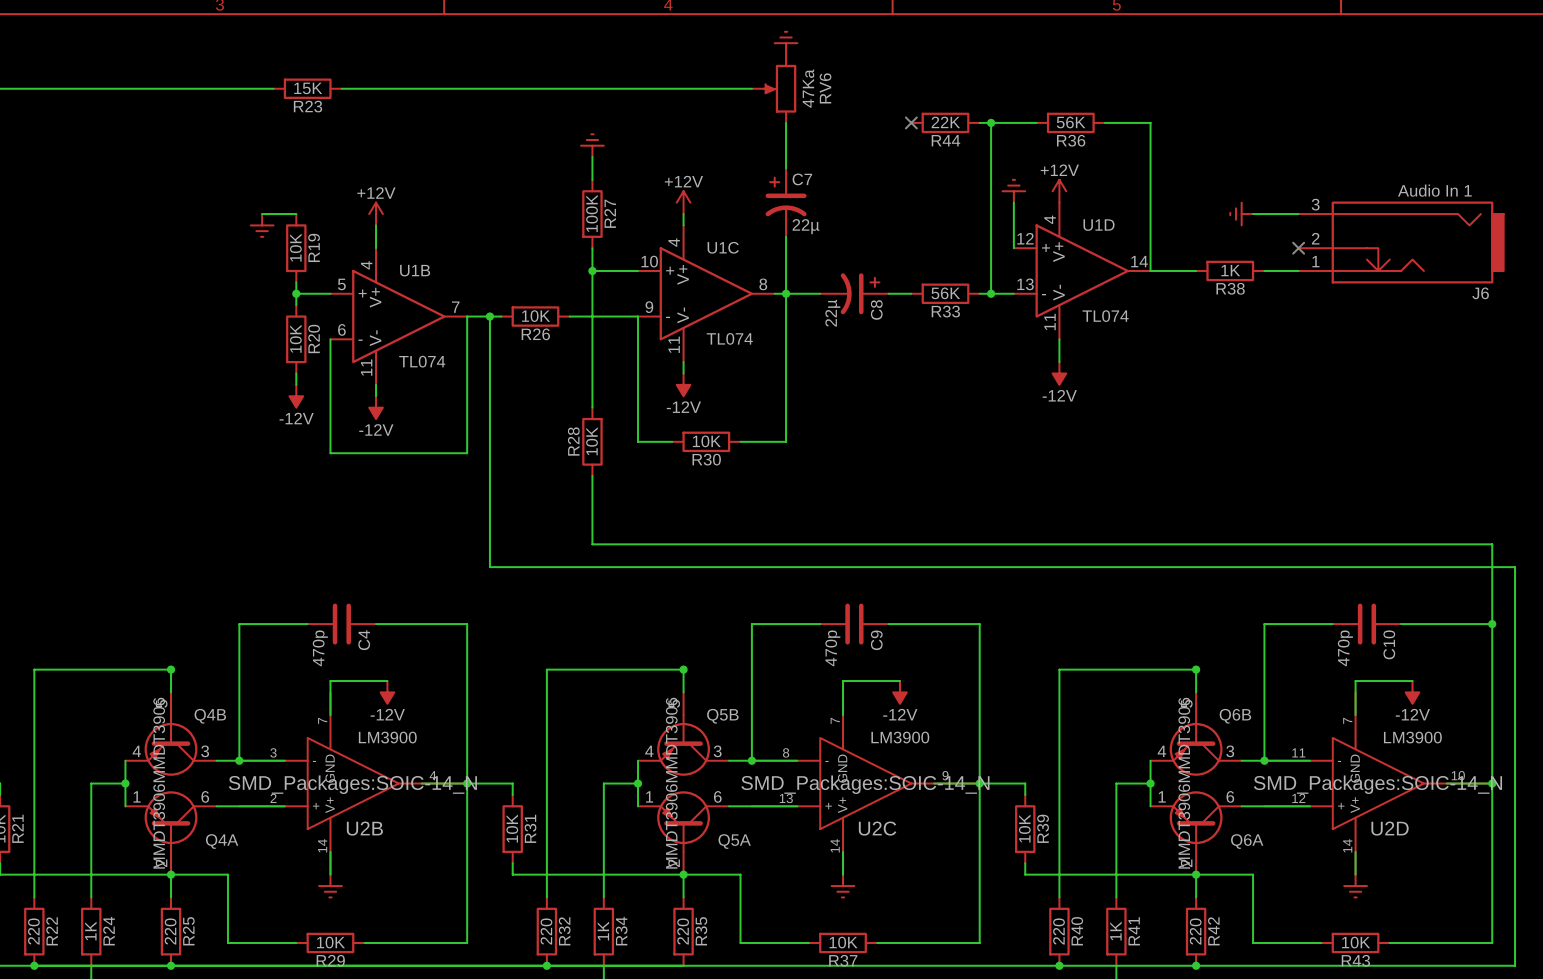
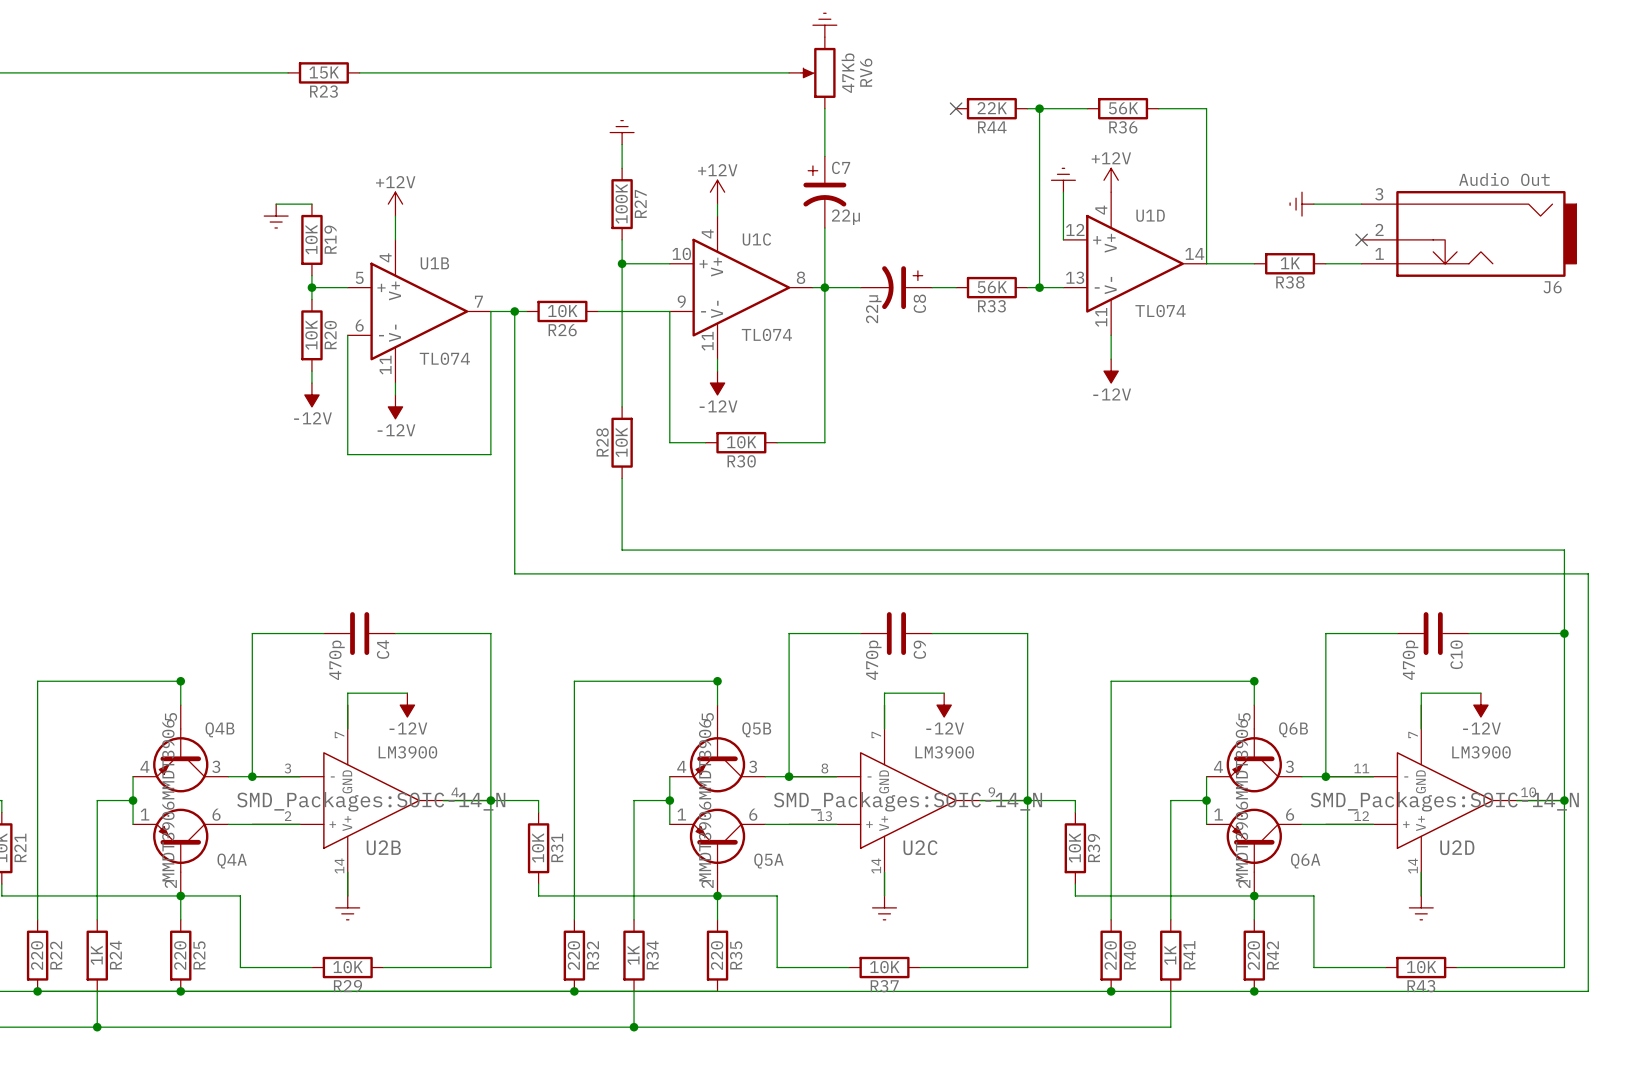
RV6 value: 47Ka (808, 88) -> 47Kb (848, 73)
J6 value: Audio In 1 (1434, 190) -> Audio Out (1504, 179)

